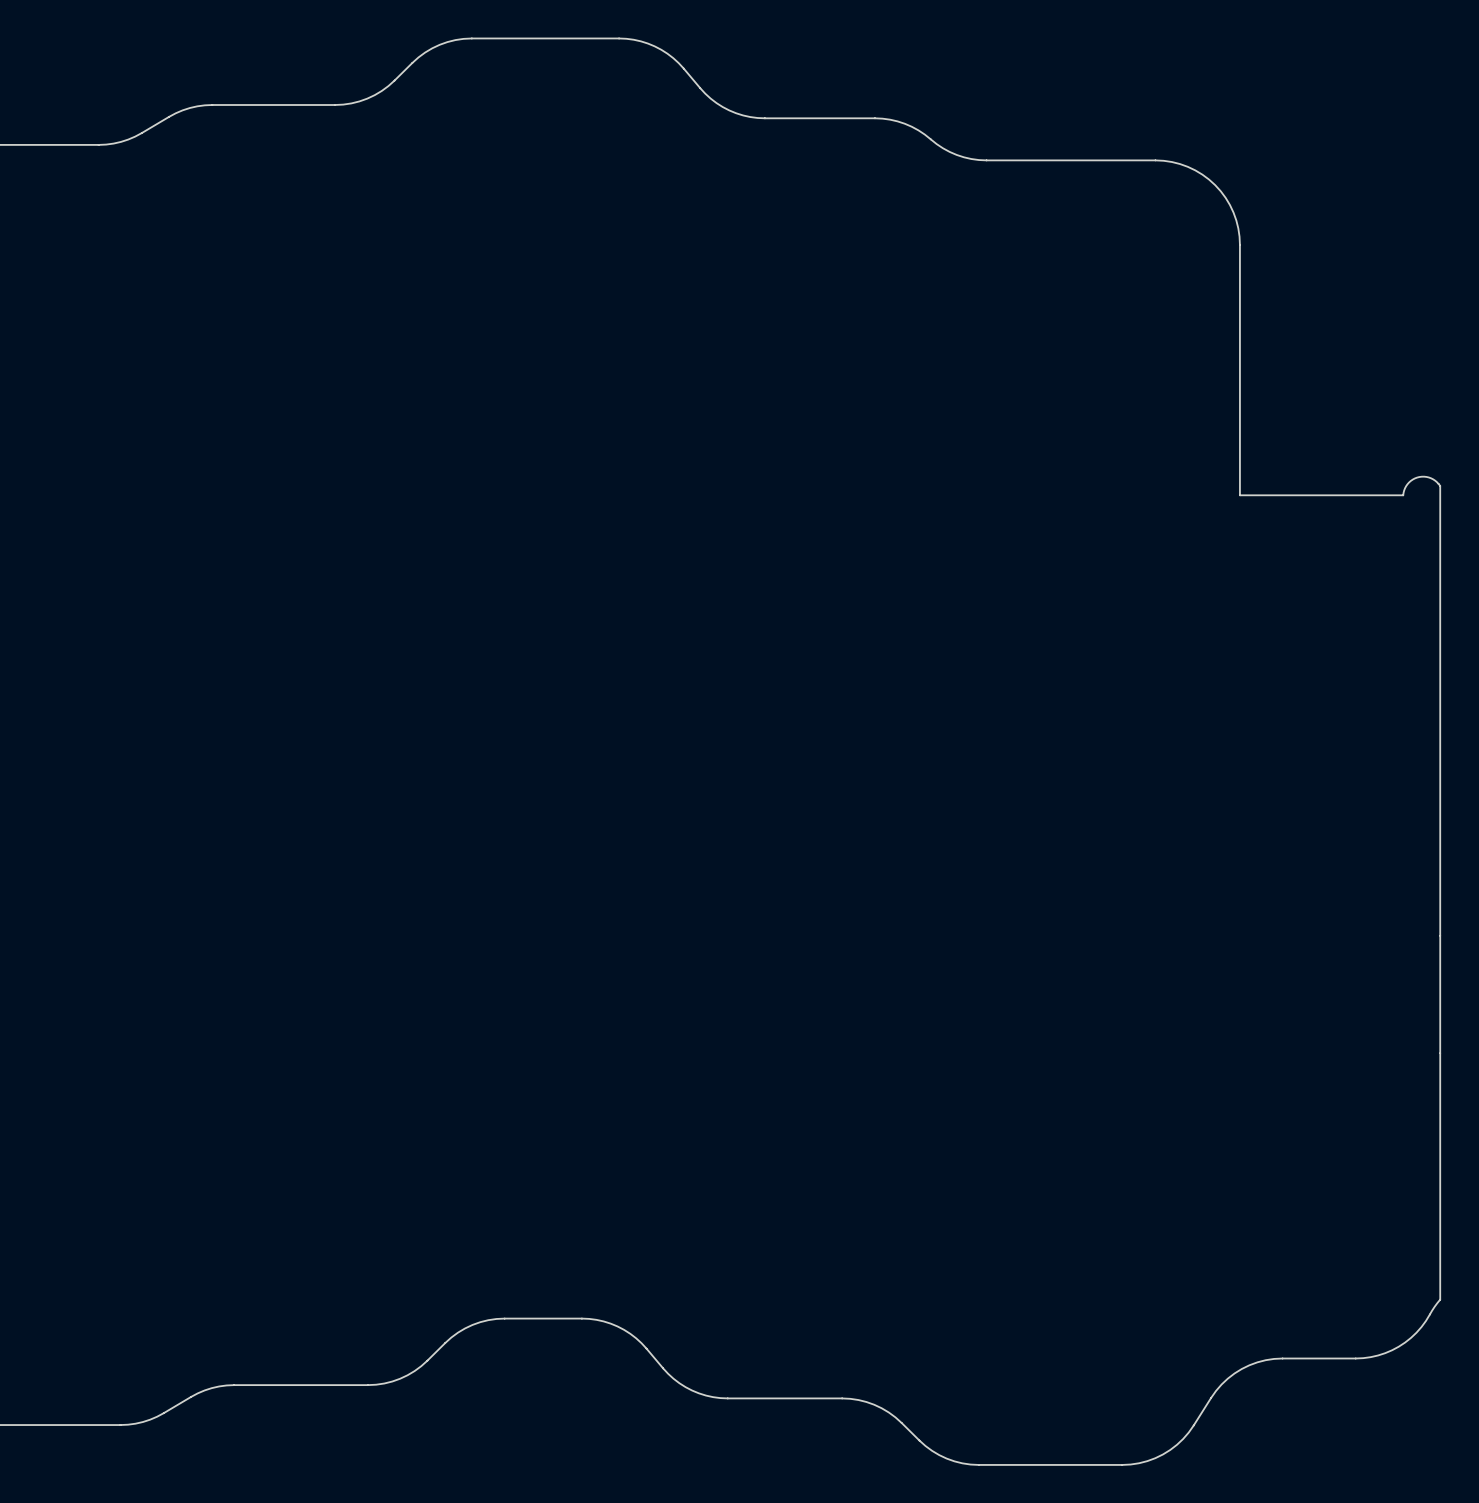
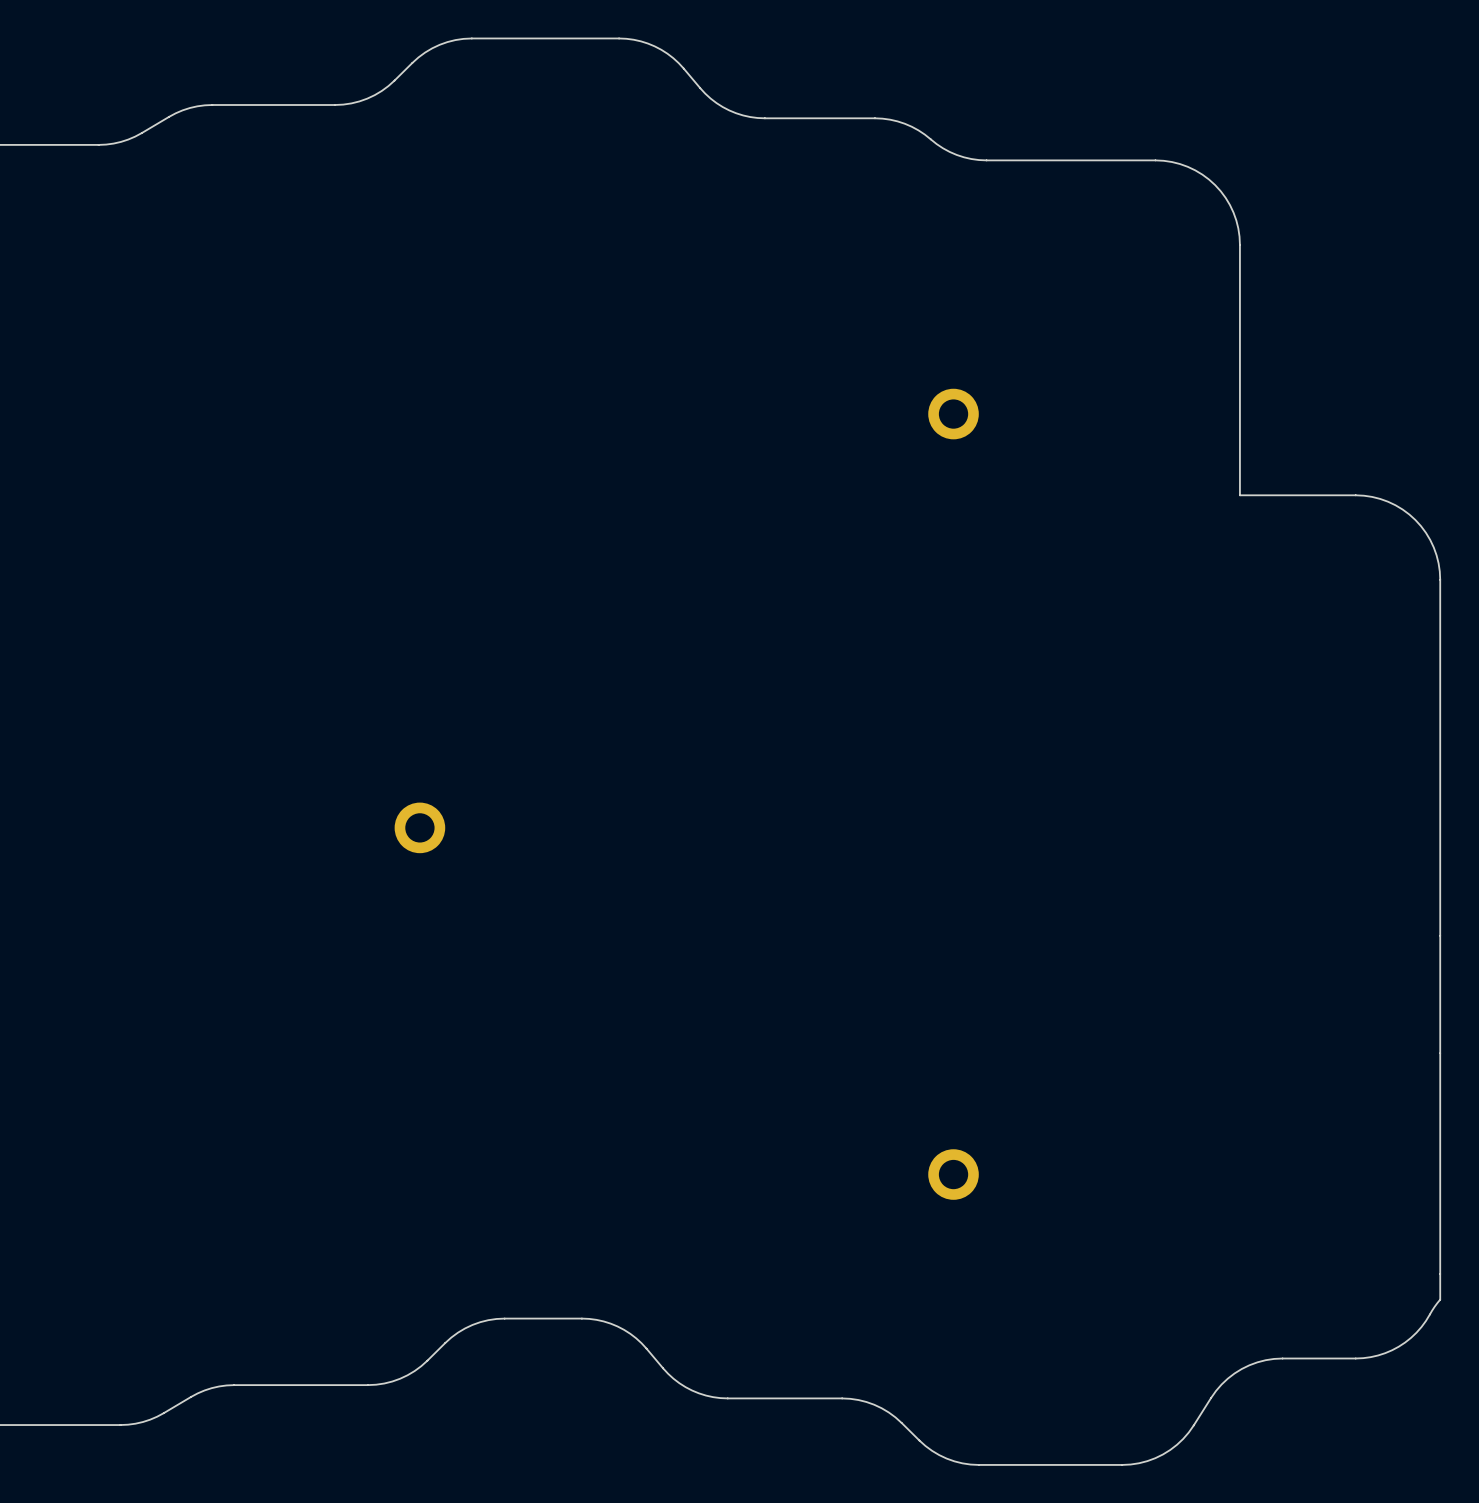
part: none -> (953, 414)
board edge: (1355, 495) (1403, 495) (1407, 484) (1419, 477) (1428, 477) (1437, 482) (1440, 485) (1440, 579) -> (1355, 495) (1372, 496) (1388, 501) (1402, 509) (1415, 520) (1425, 532) (1433, 547) (1438, 563) (1440, 579)
part: none -> (419, 827)
part: none -> (953, 1174)

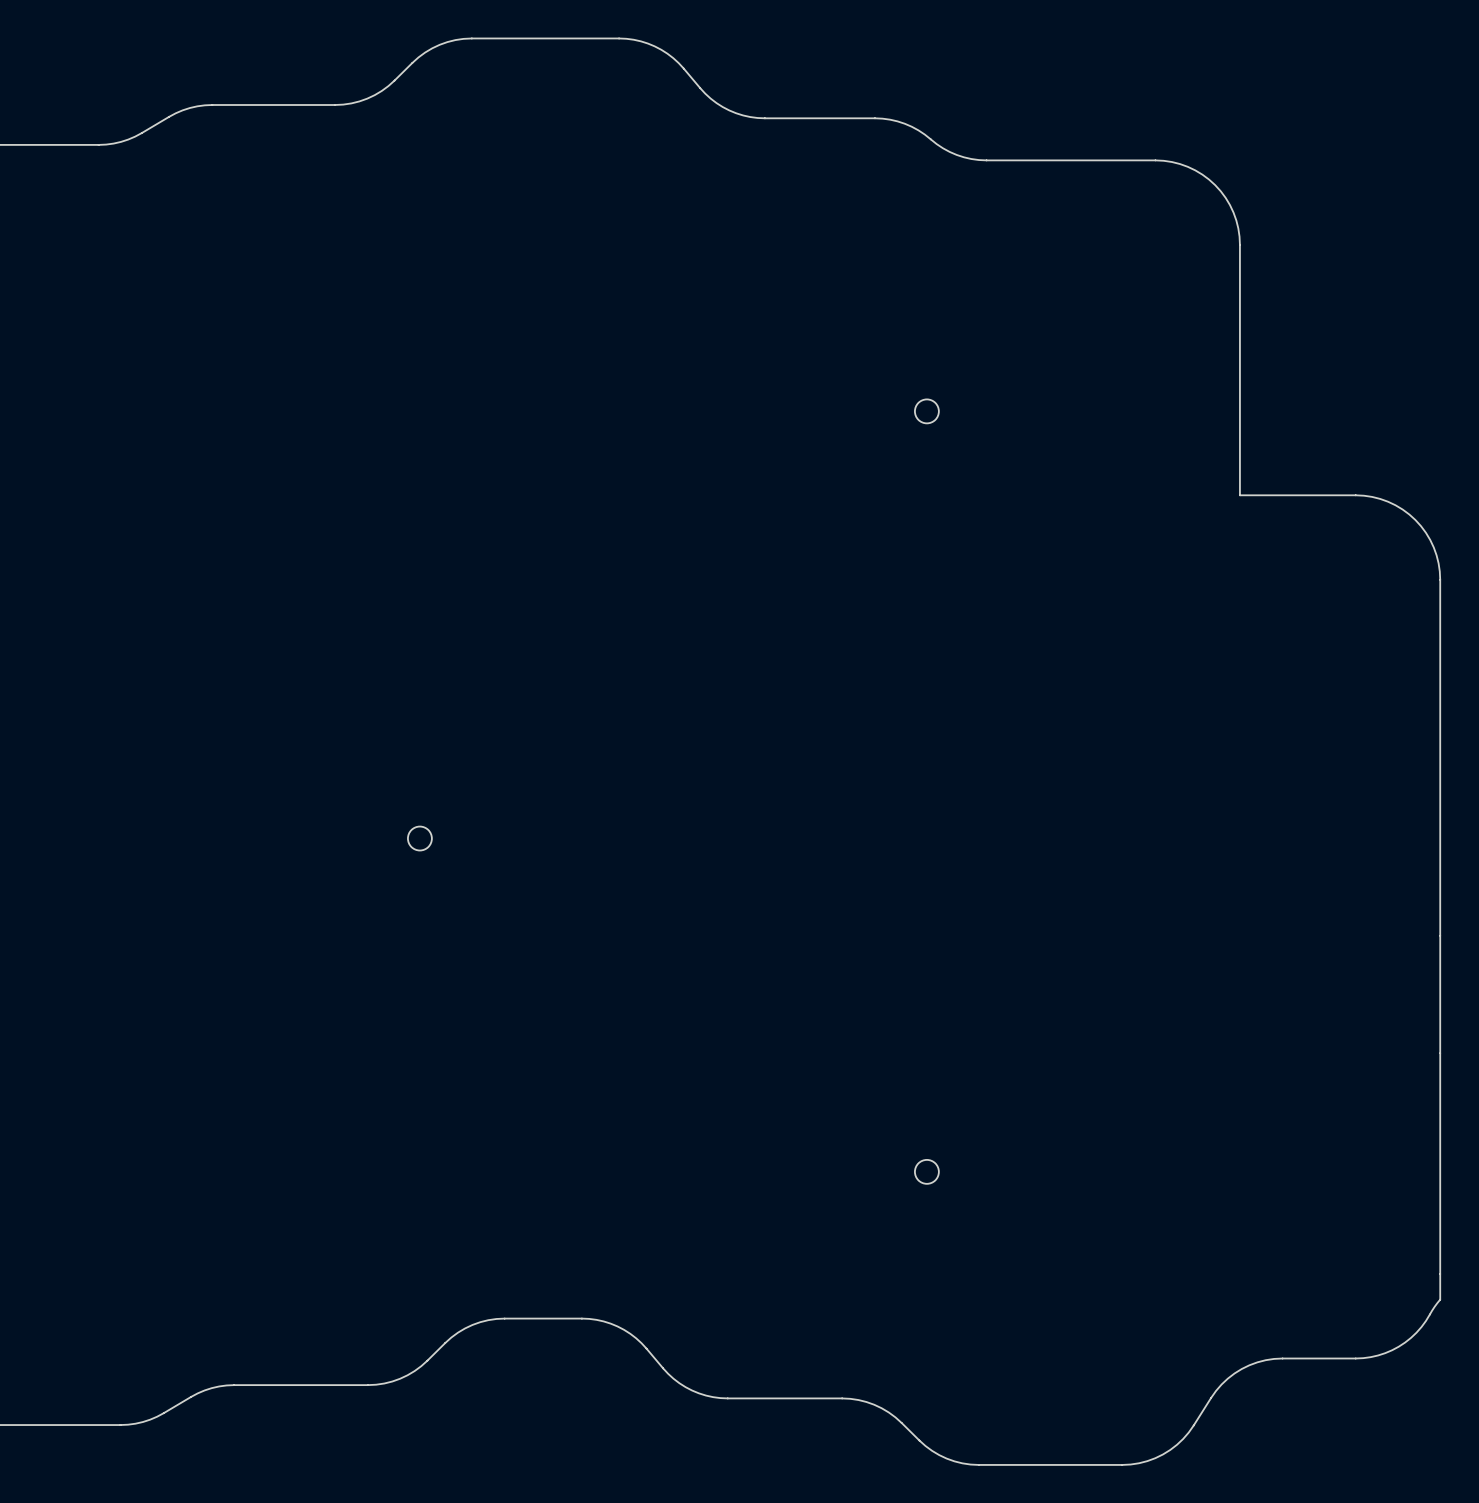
round board edge: none -> [914, 399, 940, 424]
part: (953, 414) -> none
round board edge: none -> [407, 826, 433, 851]
part: (419, 827) -> none
round board edge: none -> [914, 1159, 940, 1185]
part: (953, 1174) -> none

